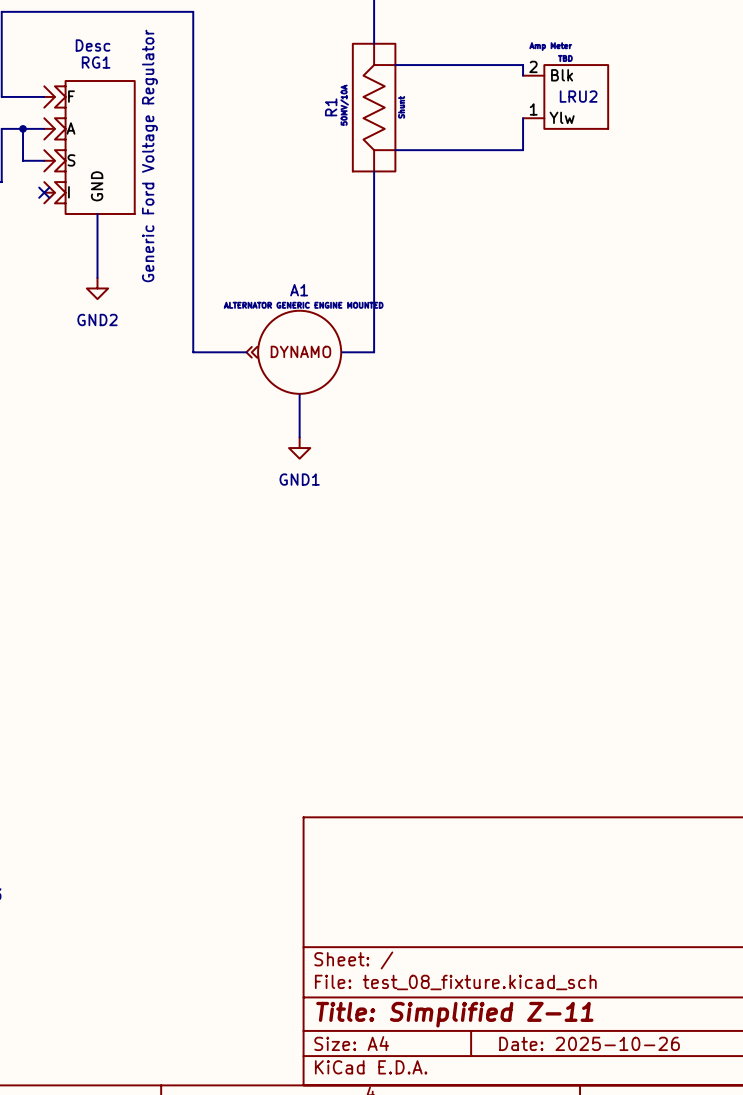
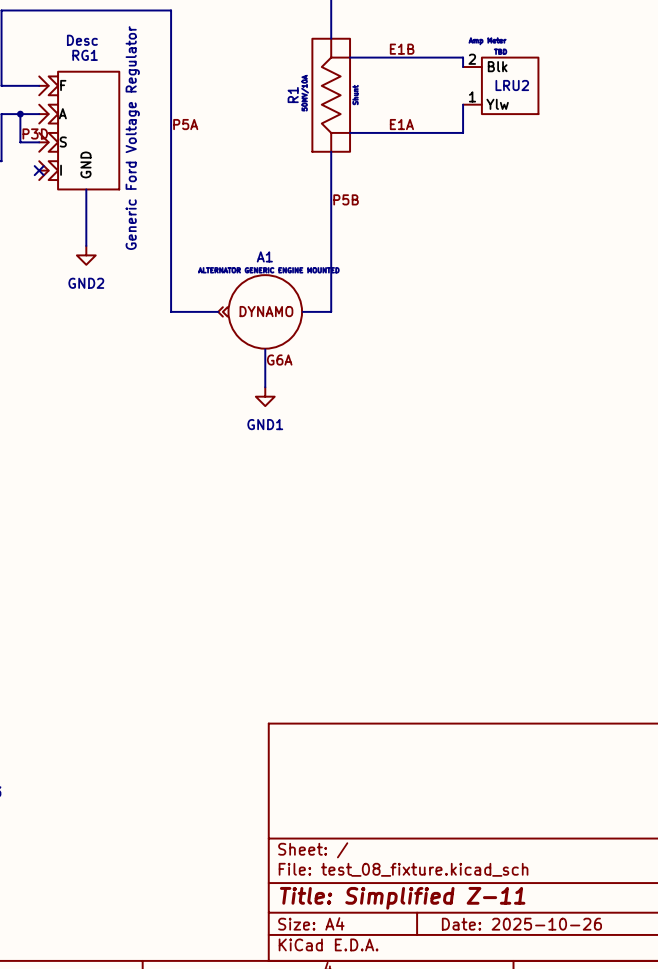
label: none -> E1B (402, 49)
label: none -> P5A (185, 124)
label: none -> E1A (401, 124)
label: none -> P3D (35, 133)
label: none -> P5B (346, 199)
label: none -> G6A (279, 360)

